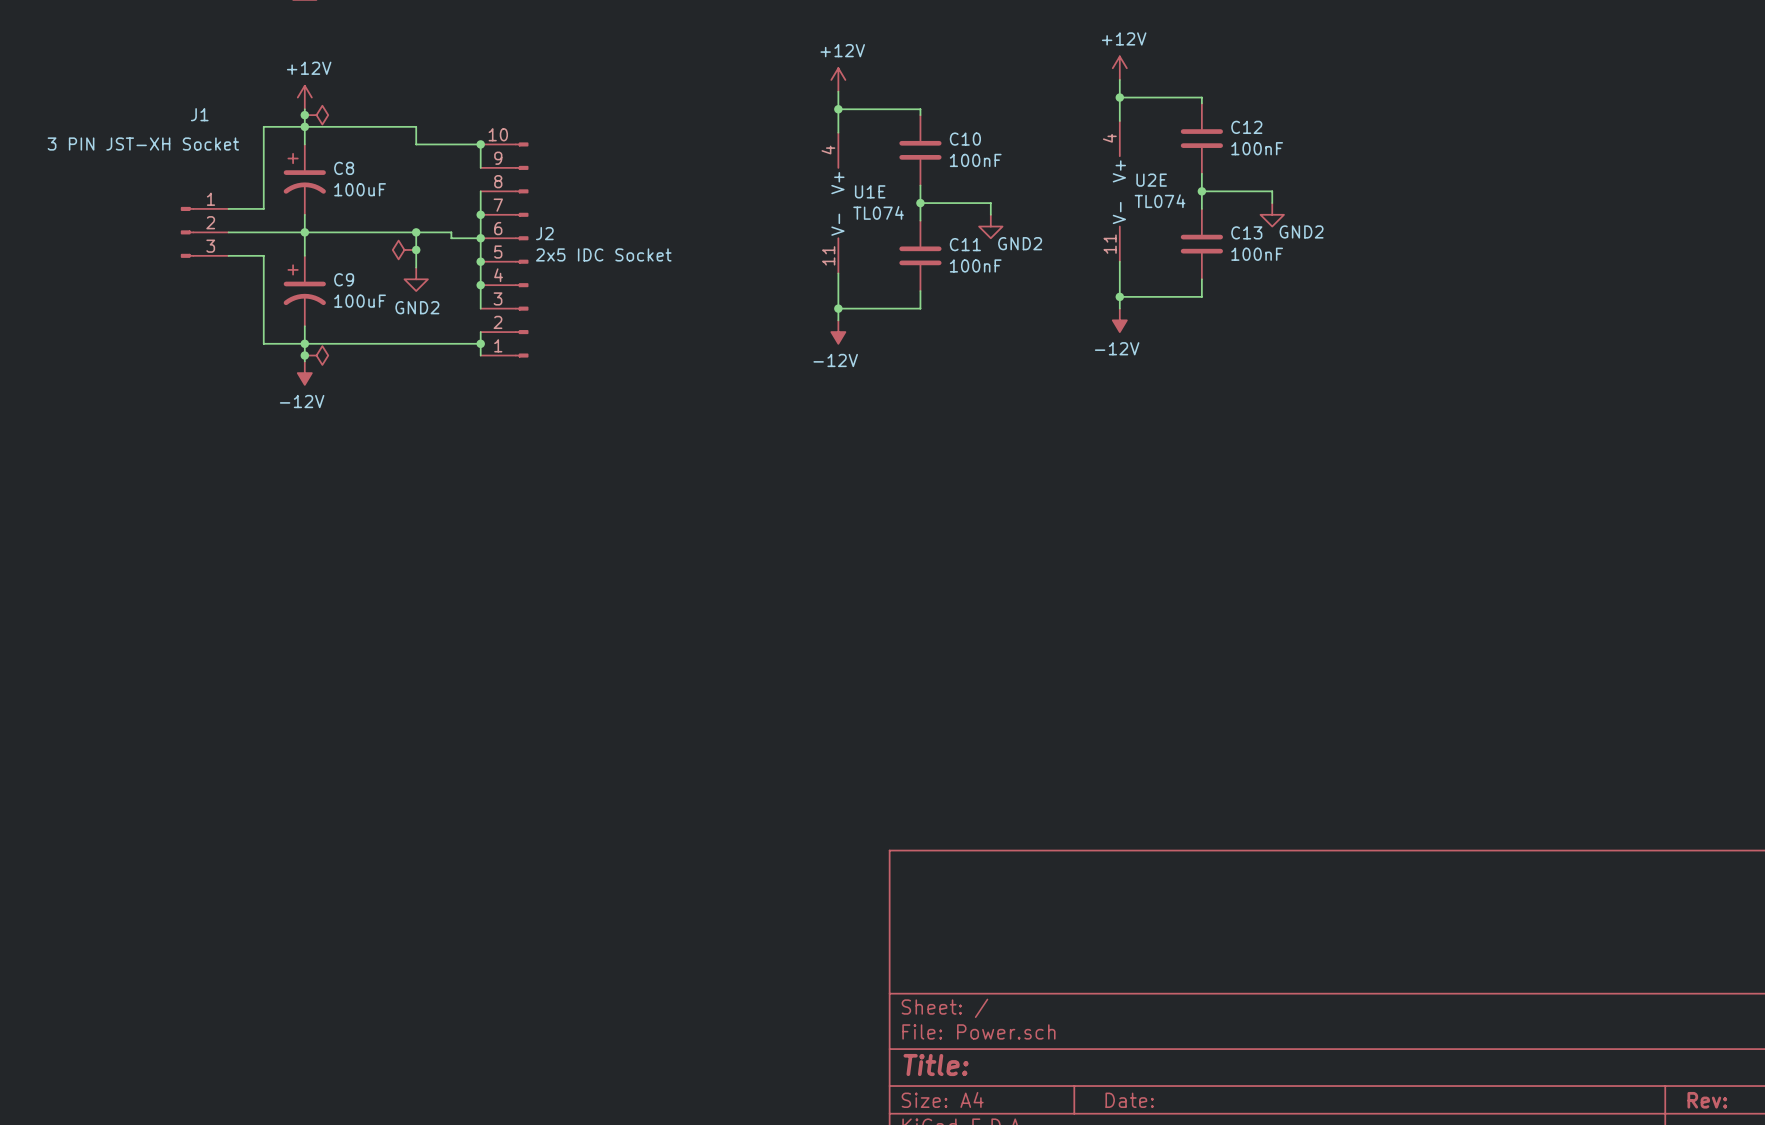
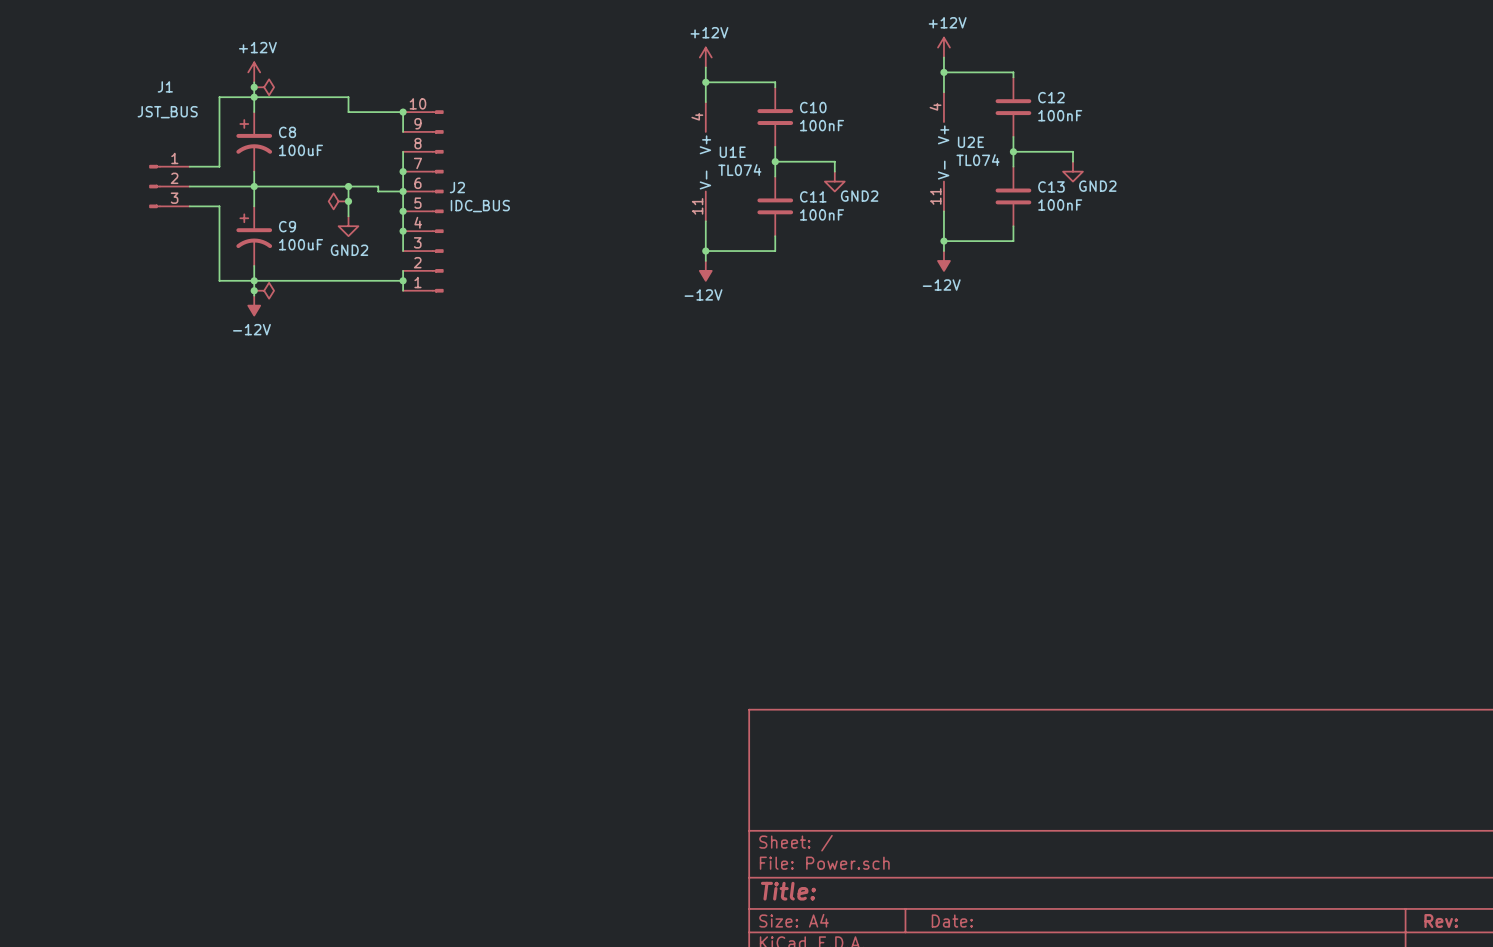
J1 value: 3 PIN JST-XH Socket (143, 144) -> JST_BUS (167, 112)
J2 value: 2x5 IDC Socket (603, 254) -> IDC_BUS (480, 206)

